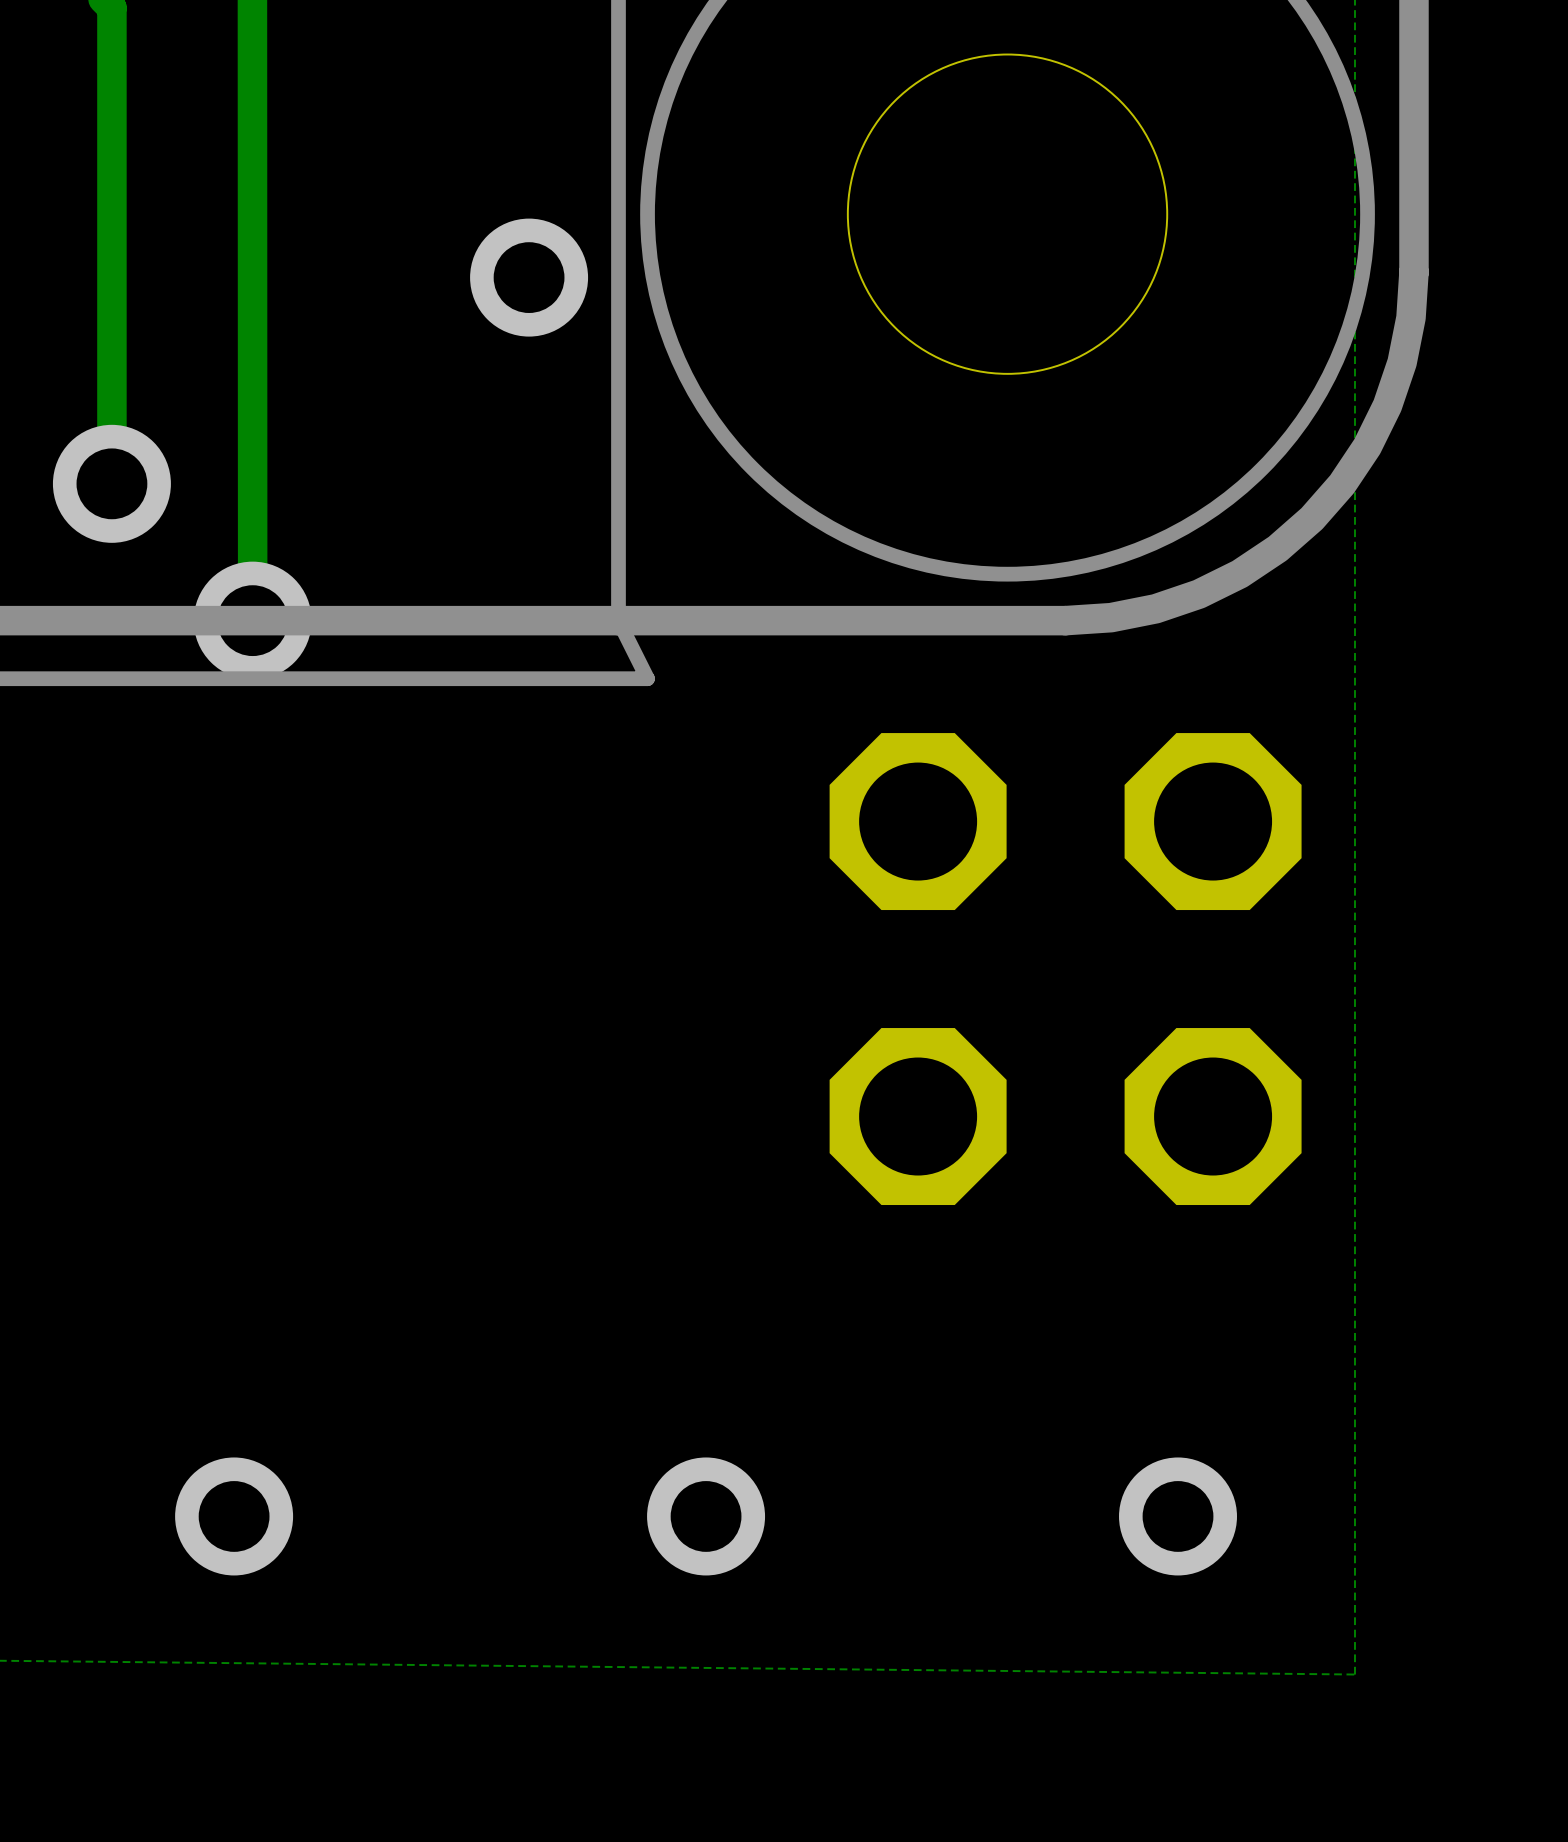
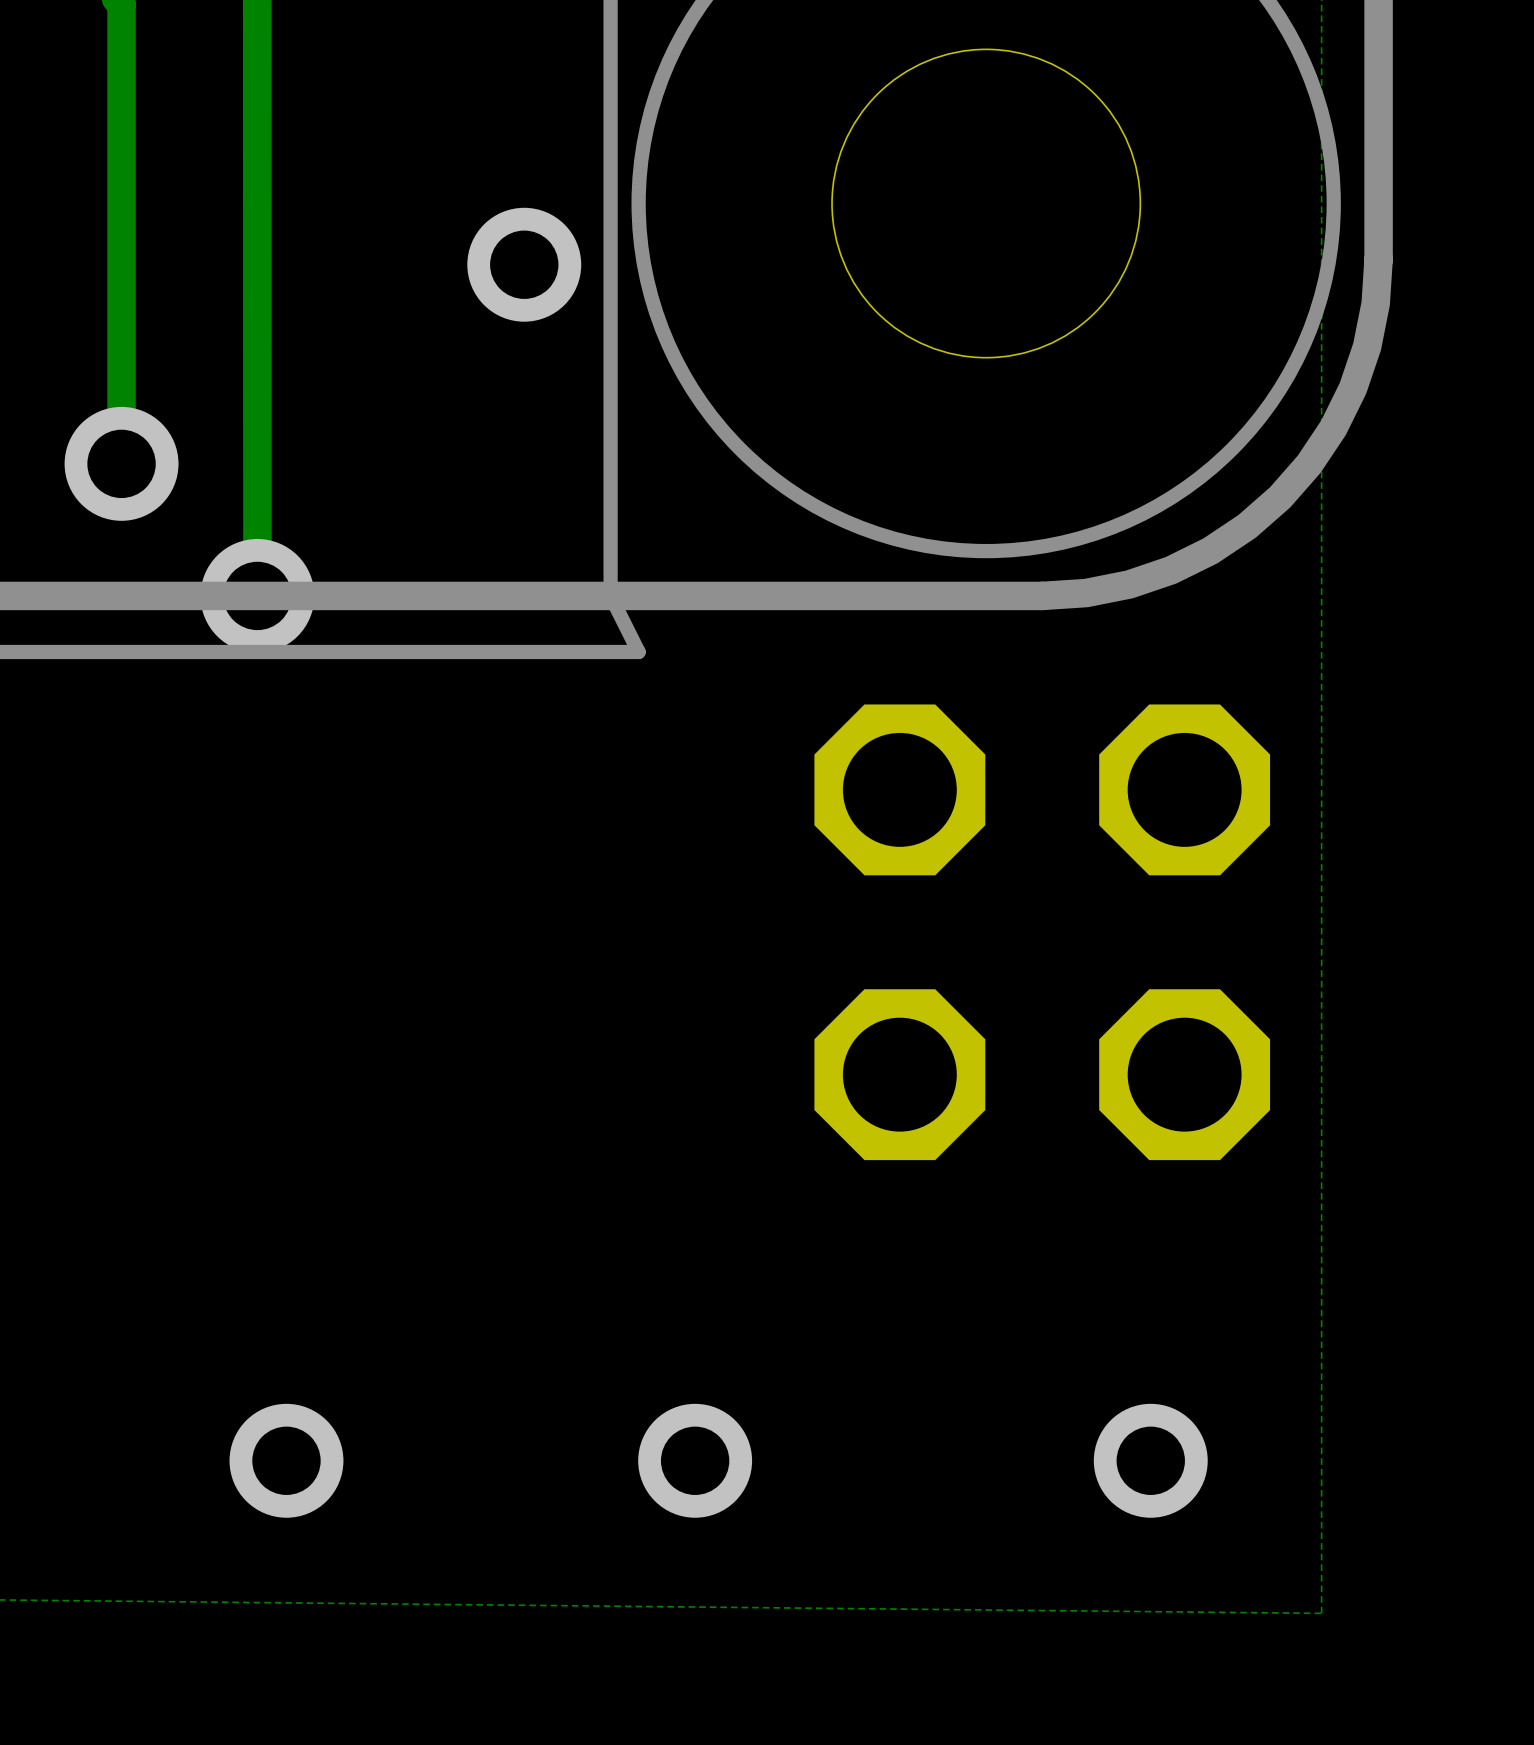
via position: (234, 1516) -> (286, 1460)

